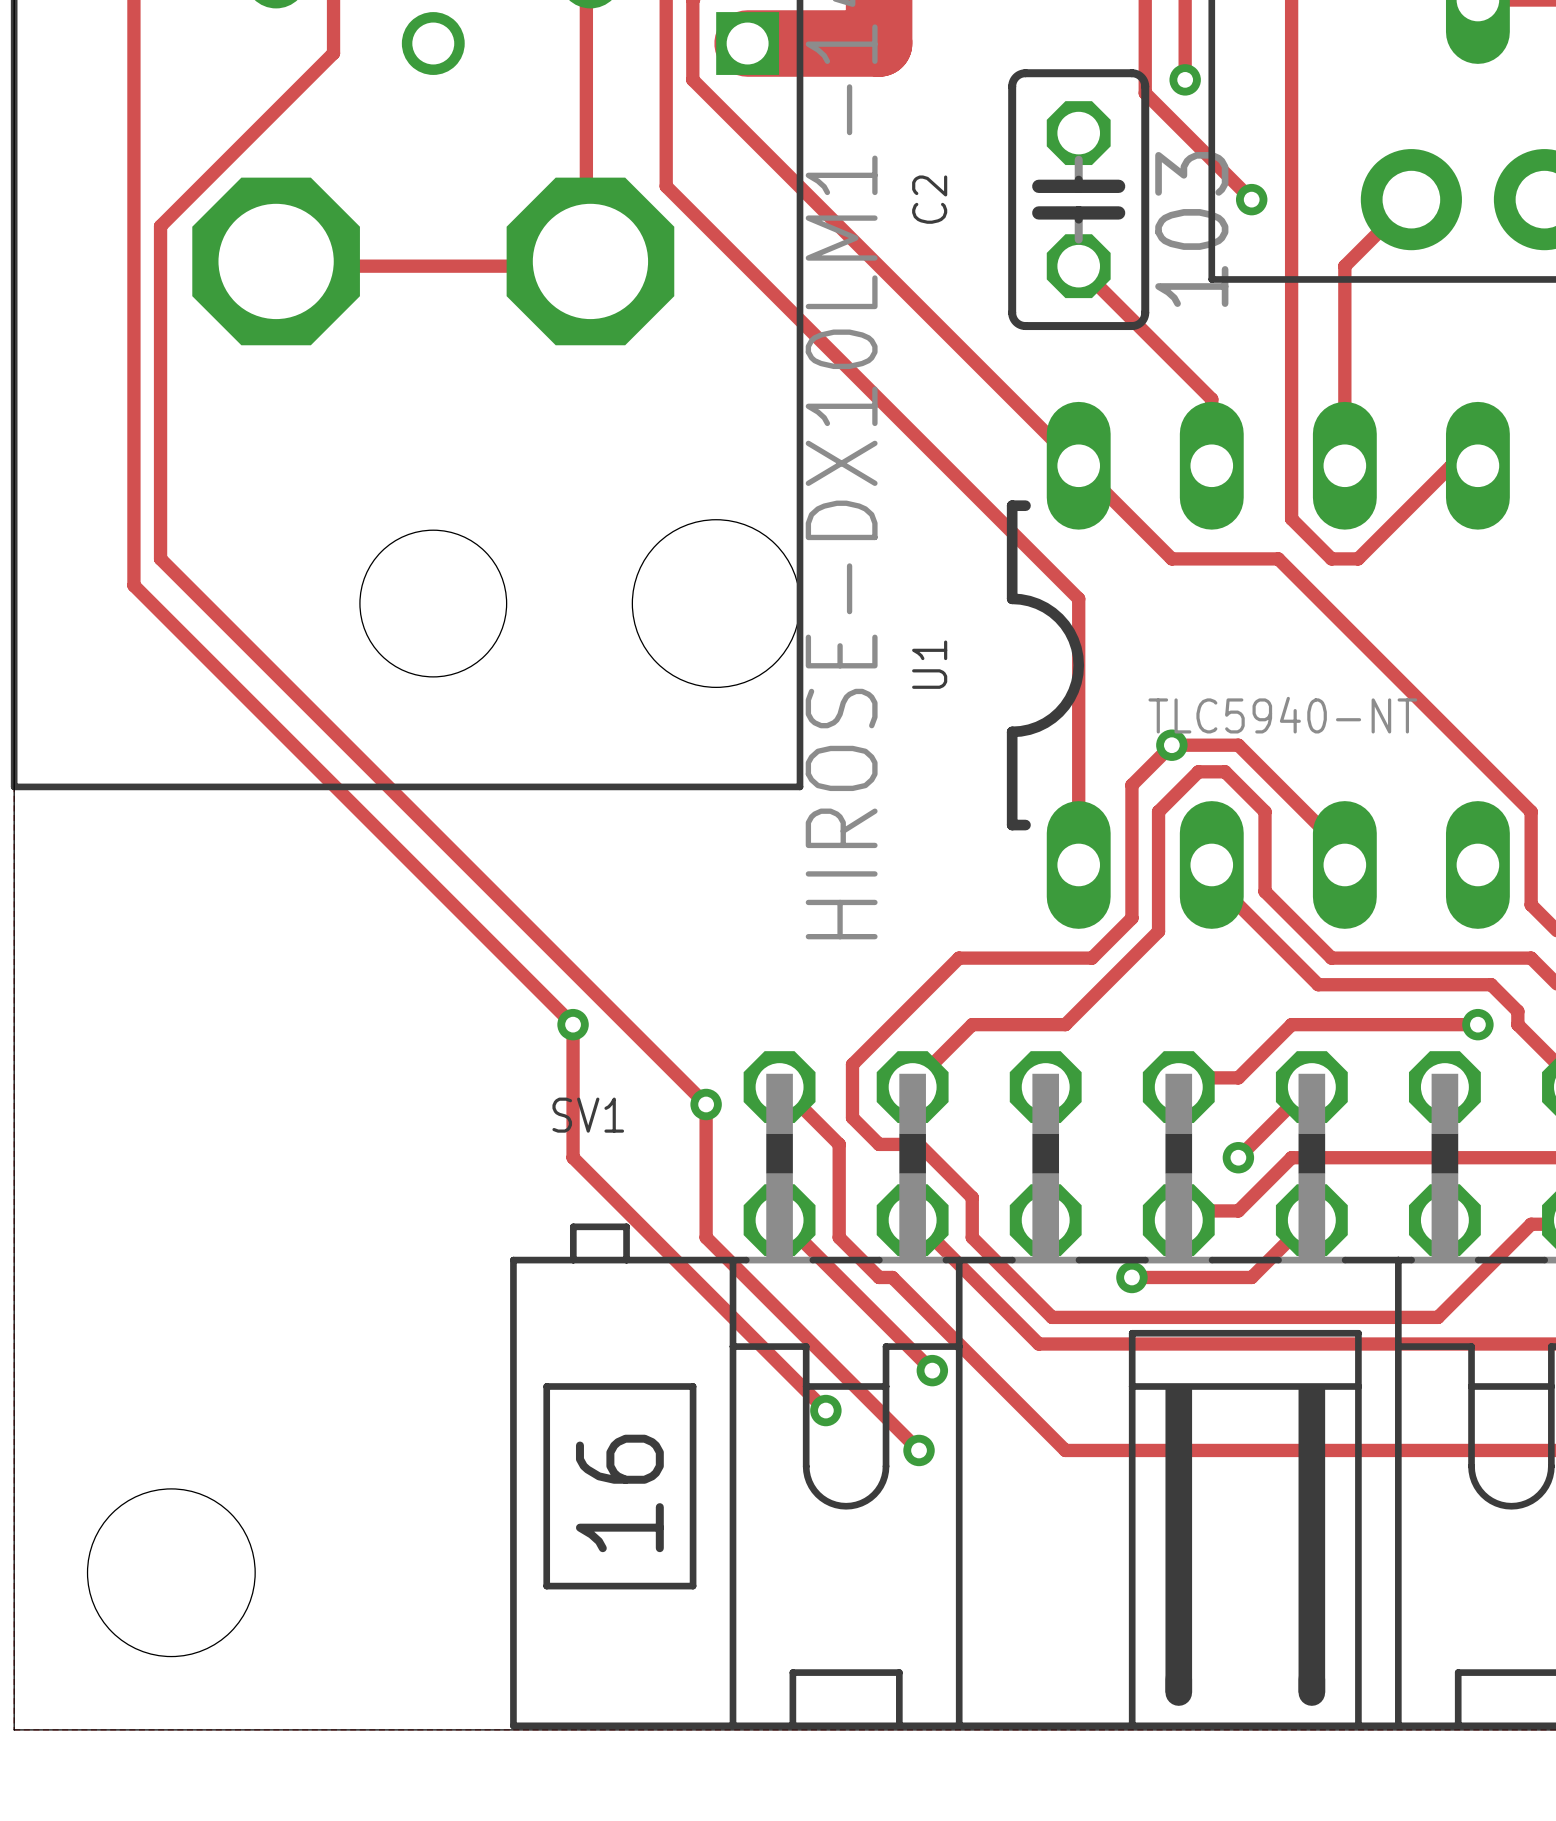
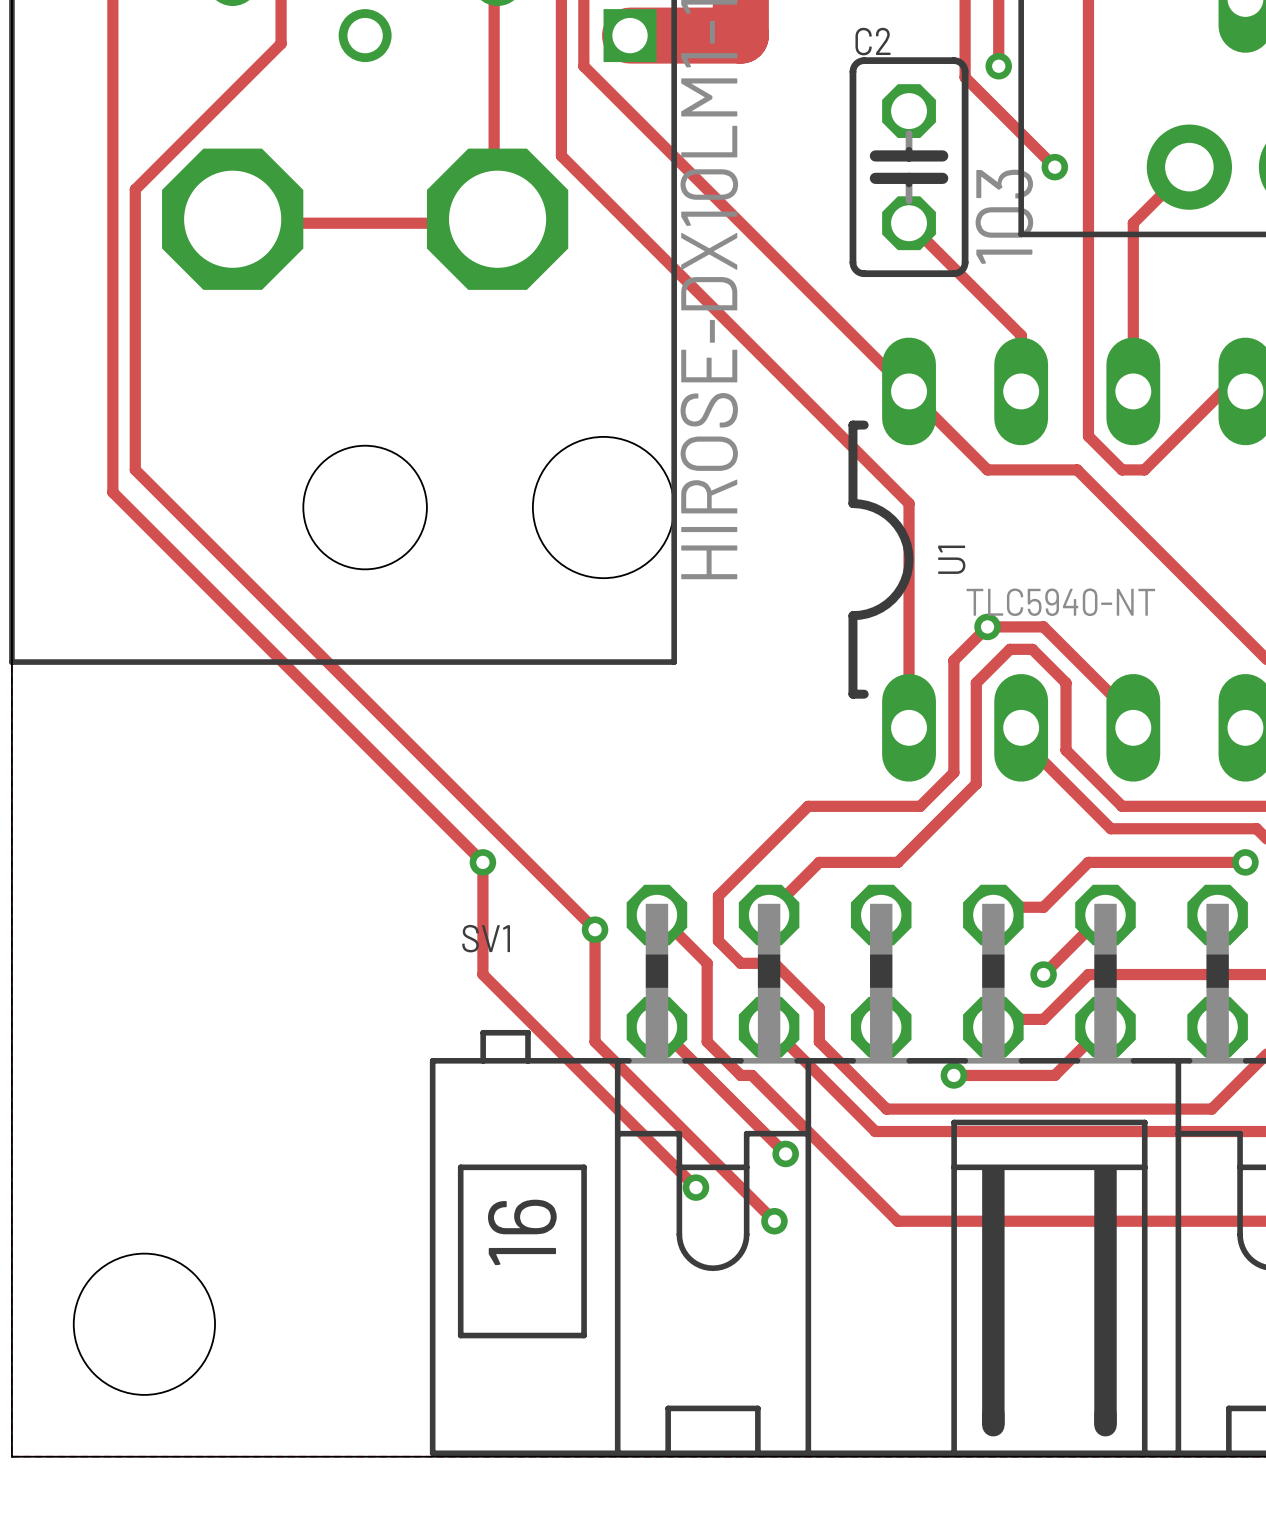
C2 name rotation: 0° (929, 199) -> 90° clockwise (872, 41)
C2 name position: C2 (929, 199) -> C2 (872, 41)
U1 name position: U1 (929, 664) -> U1 (951, 559)

